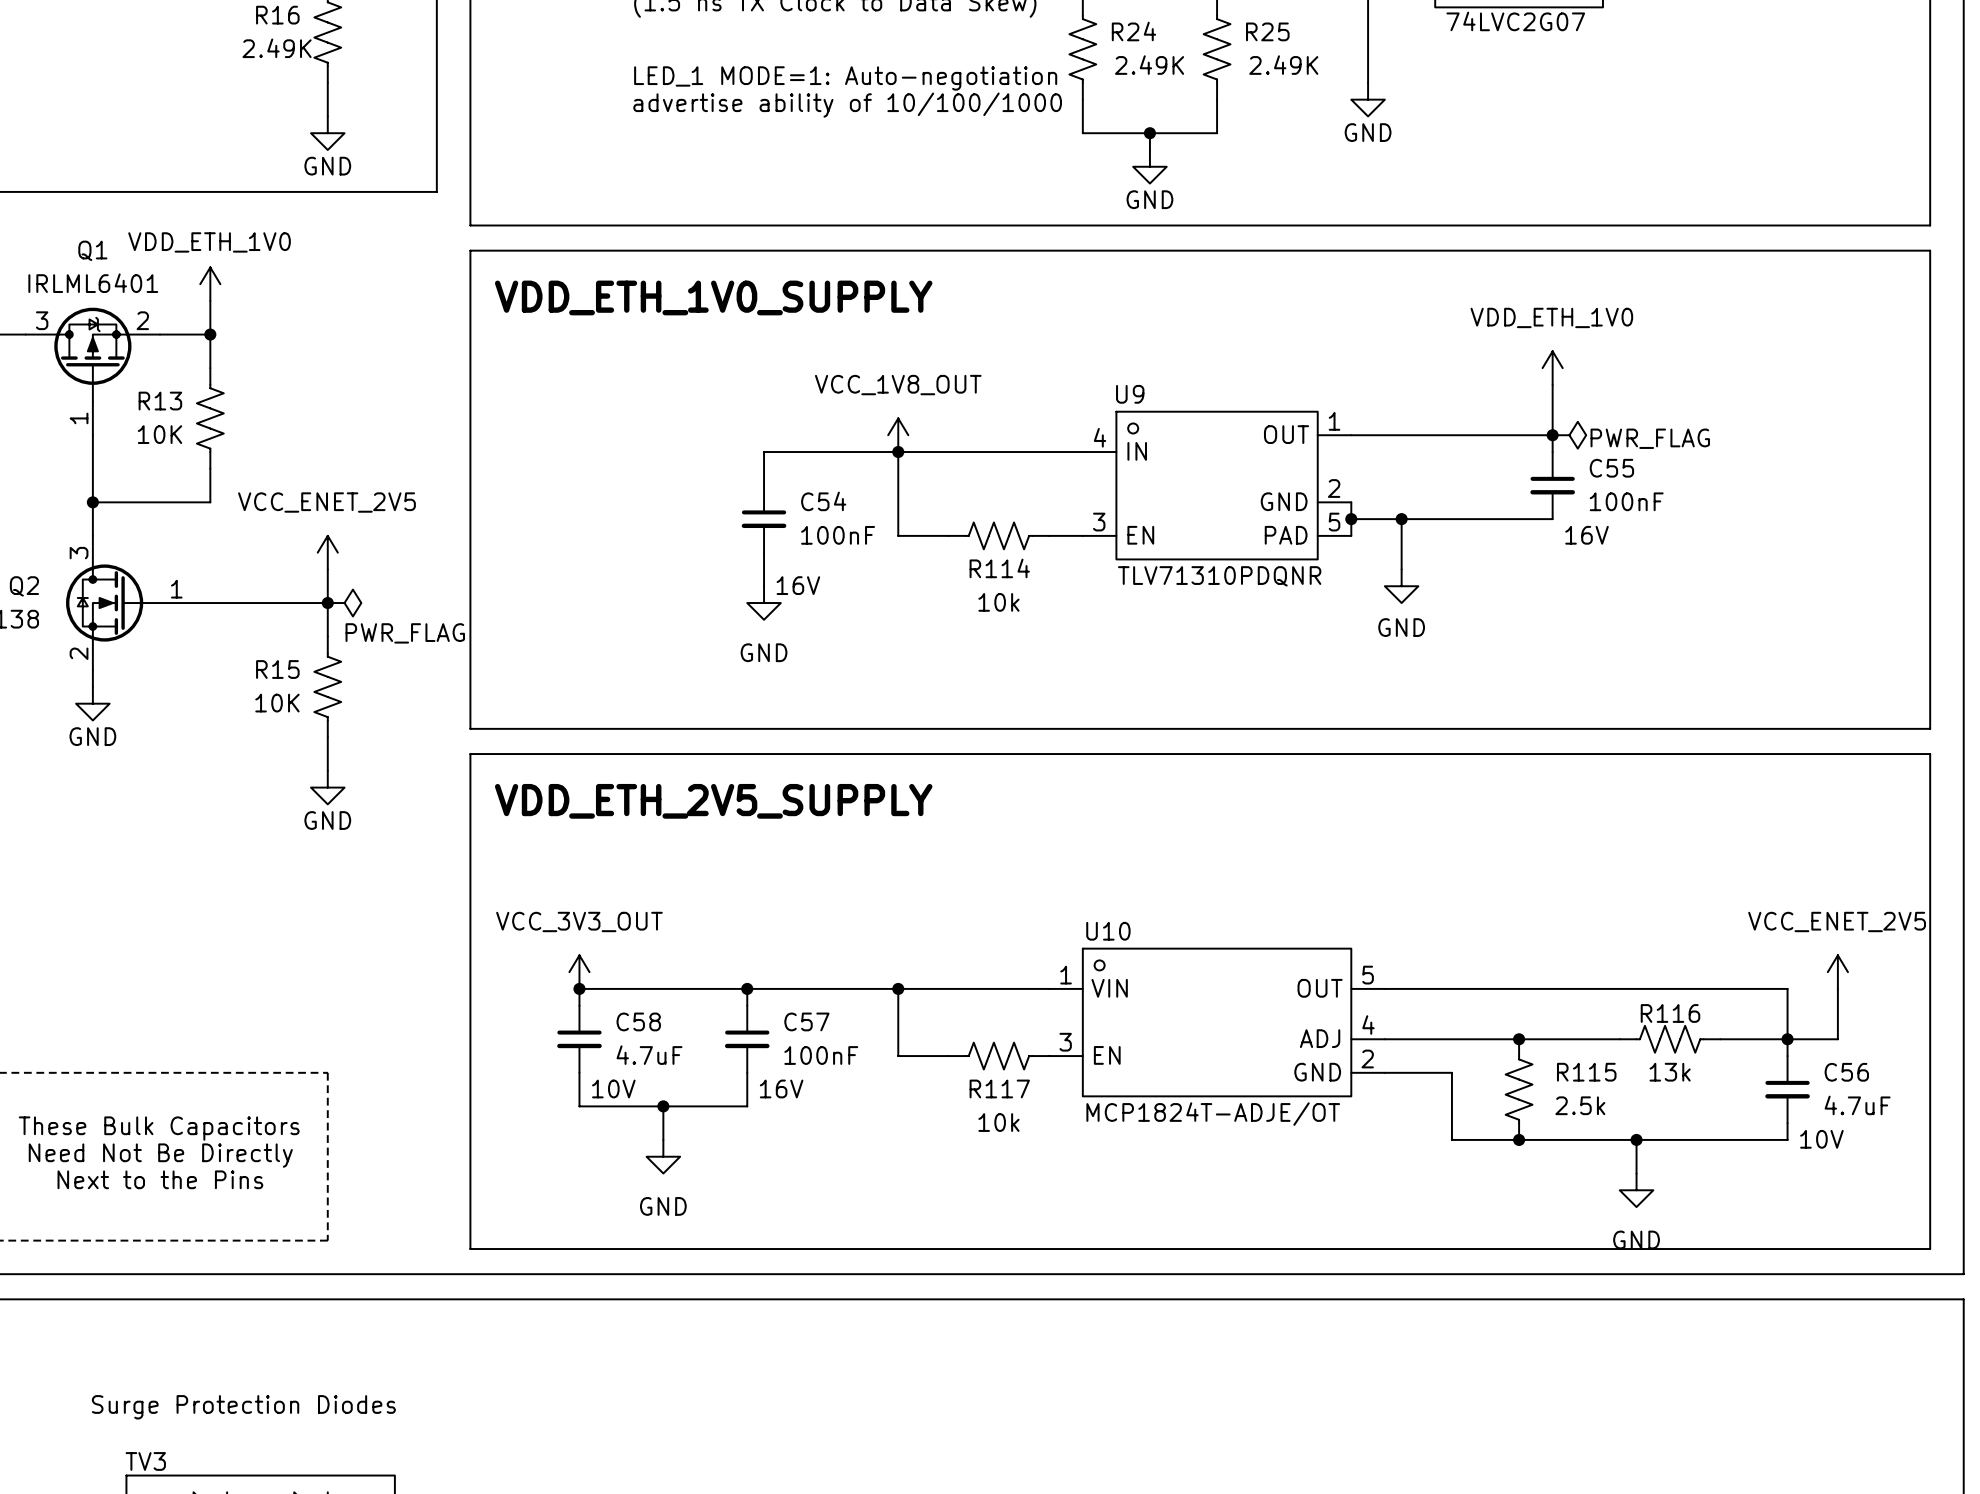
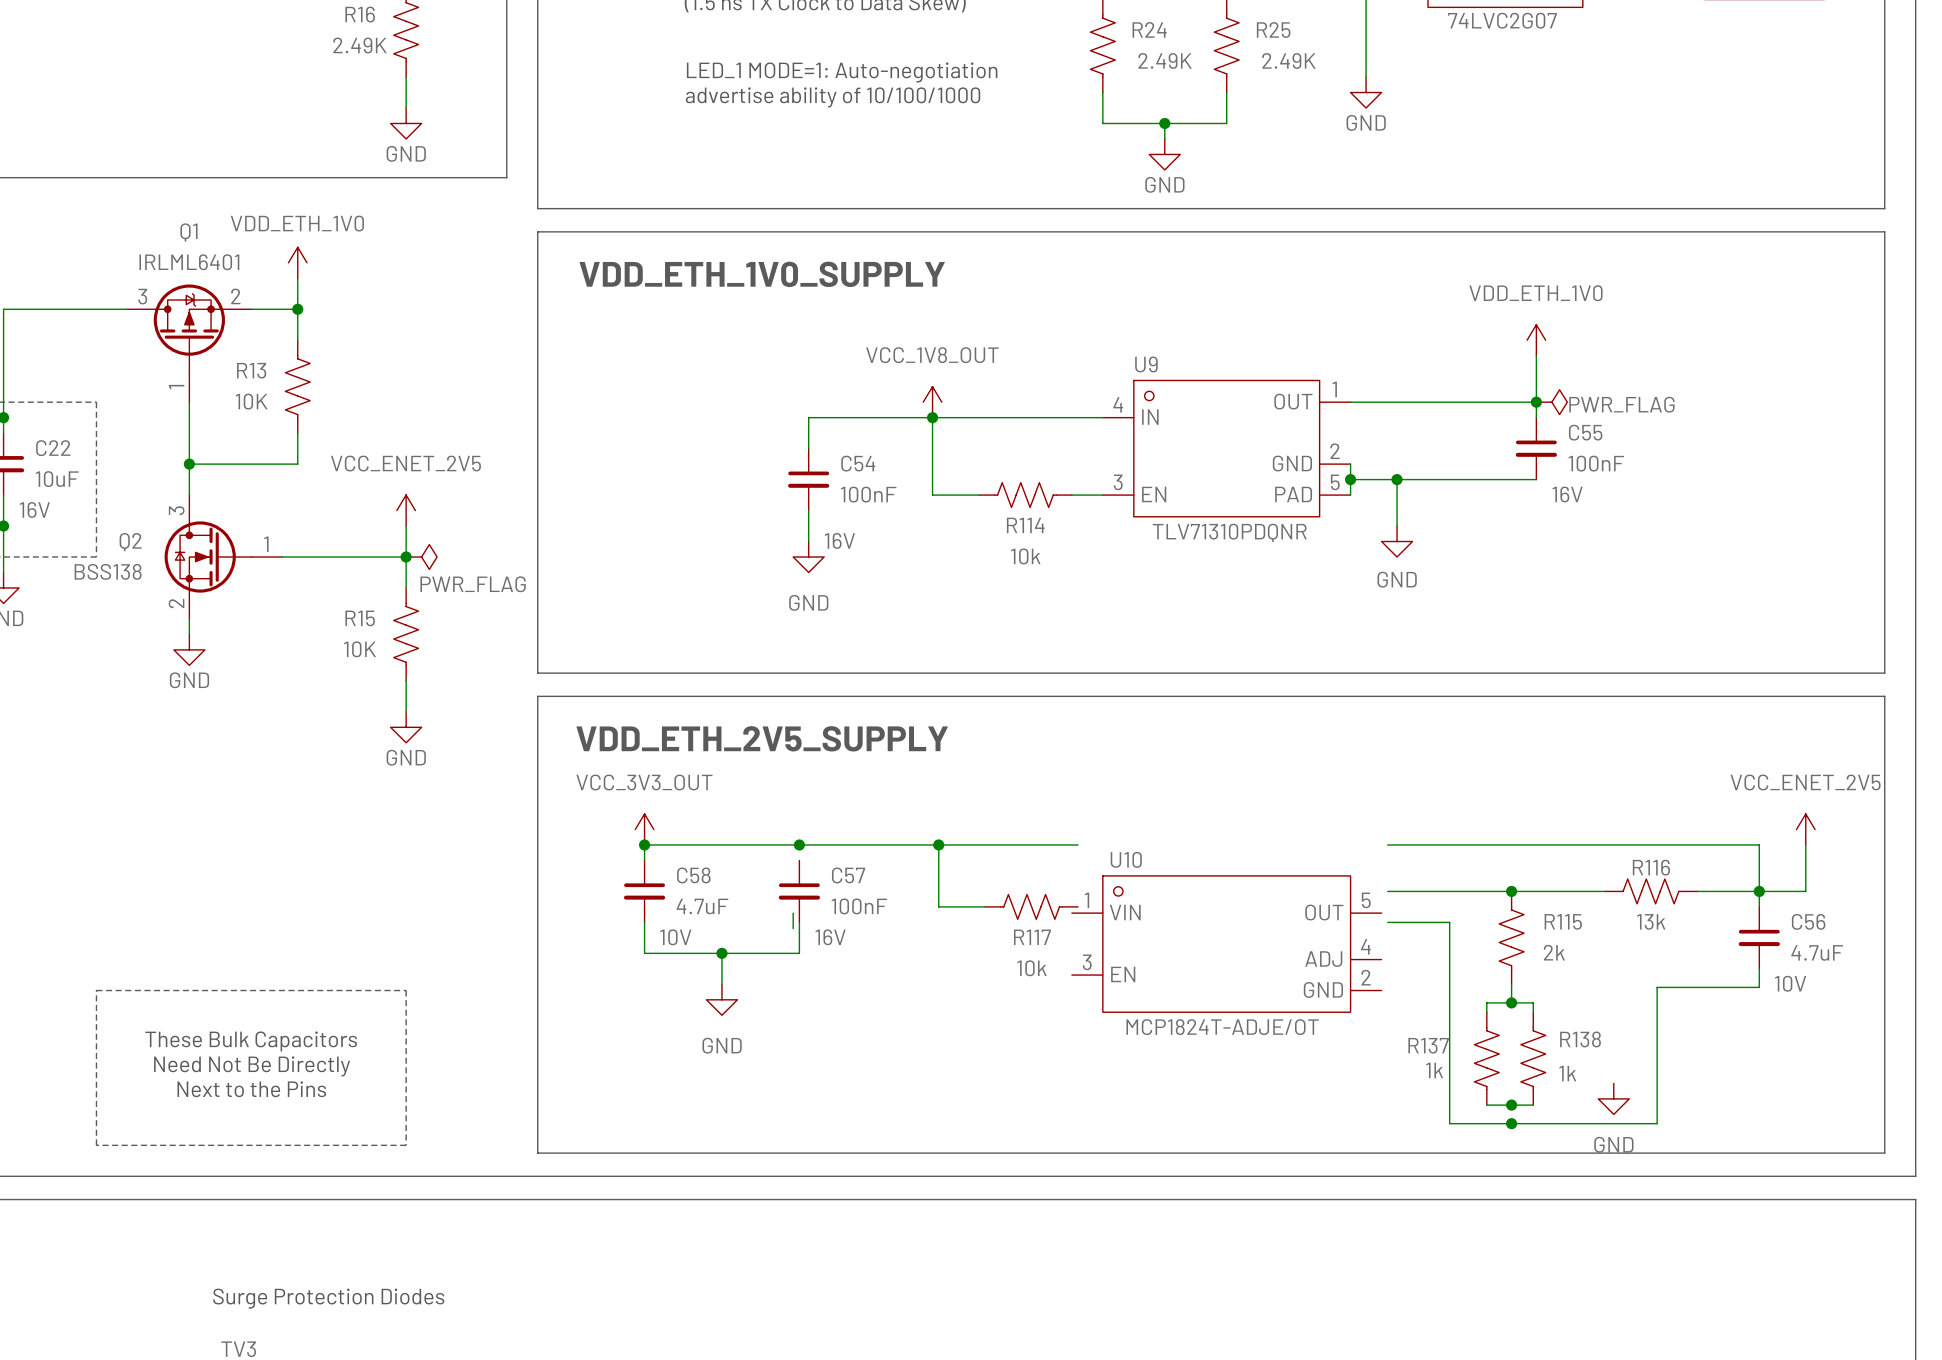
junction: none -> (644, 844)
junction: none -> (799, 844)
junction: none -> (1511, 891)
power symbol position: VCC_3V3_OUT (579, 972) -> VCC_3V3_OUT (644, 829)
power symbol position: VCC_ENET_2V5 (1837, 972) -> VCC_ENET_2V5 (1805, 829)
junction: (579, 988) -> none
junction: (747, 988) -> none
wire: (898, 988) (898, 1056) (948, 1056) -> (938, 844) (938, 906) (985, 906)
junction position: (898, 988) -> (938, 844)
wire: (1049, 988) (579, 988) (579, 1005) -> (1078, 844) (644, 844) (644, 860)
wire: (1384, 988) (1787, 988) (1787, 1056) -> (1387, 844) (1759, 844) (1759, 906)
wire: (1837, 988) (1837, 1039) (1720, 1039) -> (1805, 844) (1805, 891) (1697, 891)
wire: none -> (1387, 922) (1449, 922) (1449, 1123) (1657, 1123) (1657, 987) (1759, 987) (1759, 968)
junction: none -> (721, 953)
C58 position: (579, 1039) -> (644, 891)
C57 position: (747, 1039) -> (799, 891)
wire: (1384, 1039) (1619, 1039) -> (1387, 891) (1604, 891)
junction: (1519, 1039) -> none
R116 position: (1670, 1039) -> (1650, 891)
junction position: (1787, 1039) -> (1759, 891)
R117 position: (998, 1056) -> (1031, 906)
wire: none -> (1511, 984) (1511, 1002)
wire: (579, 1072) (579, 1106) (747, 1106) (747, 1072) -> (644, 922) (644, 953) (799, 953) (799, 922)
wire: (1384, 1072) (1451, 1072) (1451, 1139) (1787, 1139) (1787, 1123) -> none
junction: none -> (1511, 1002)
R115 position: (1519, 1089) -> (1511, 937)
C56 position: (1787, 1089) -> (1759, 937)
wire: none -> (1486, 1012) (1486, 1002) (1533, 1002) (1533, 1012)
R115 value: 2.5k (1580, 1105) -> 2k (1554, 952)
wire: (663, 1106) (663, 1139) -> (721, 953) (721, 984)
junction: (663, 1106) -> none
junction: (1519, 1139) -> none
wire: (1636, 1139) (1636, 1173) -> none
junction: (1636, 1139) -> none
R137: none -> 1k (1486, 1058)
R138: none -> 1k (1533, 1058)
power symbol position: GND (663, 1156) -> GND (721, 999)
wire: none -> (1486, 1105) (1533, 1105)
junction: none -> (1511, 1105)
junction: none -> (1511, 1123)

